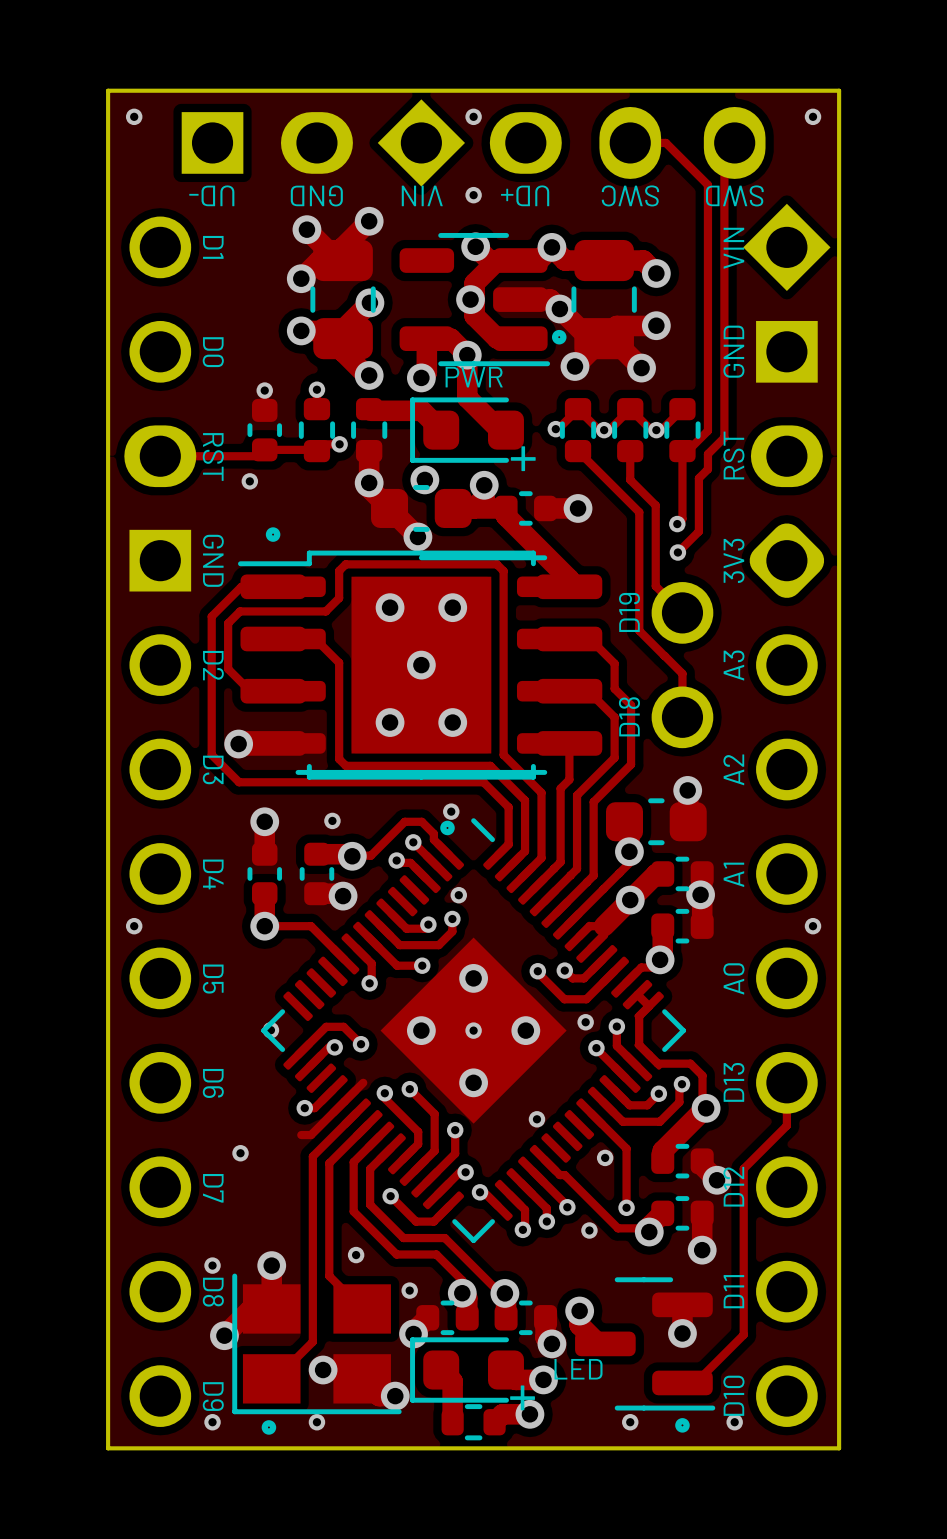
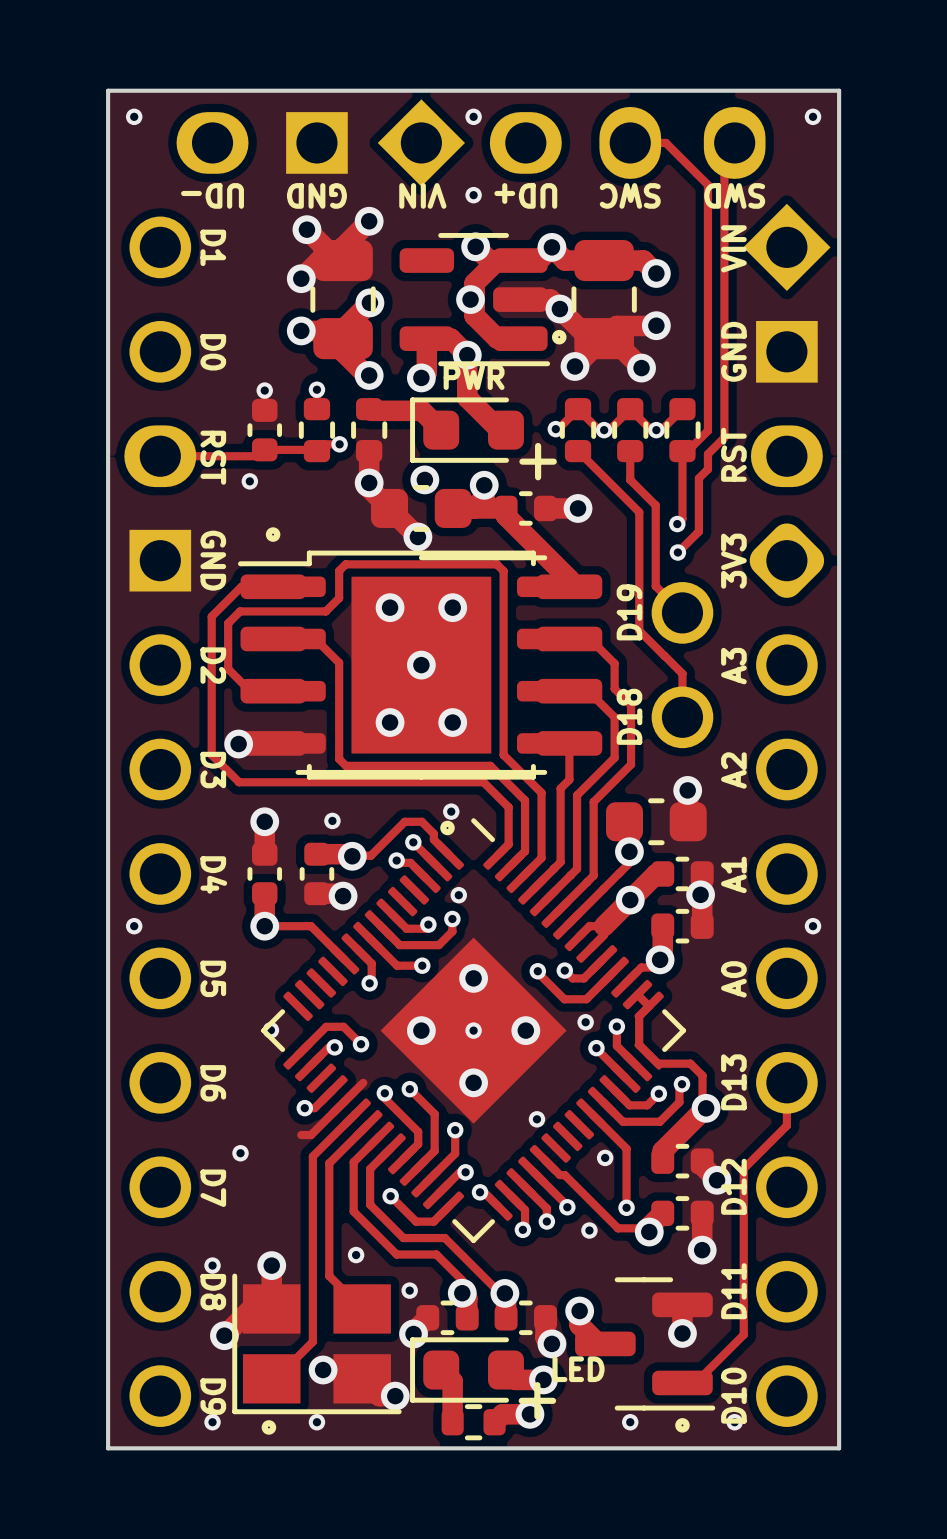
part footprint: [181, 99, 766, 187] -> [176, 99, 766, 187]

